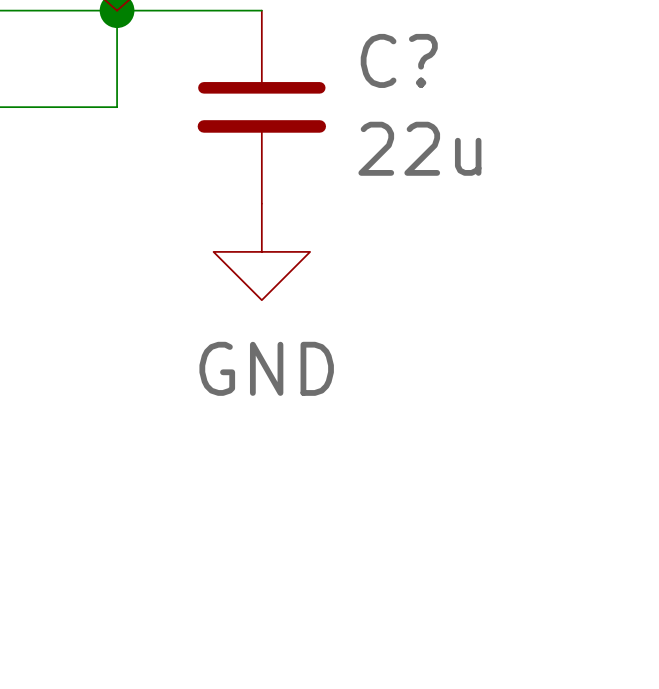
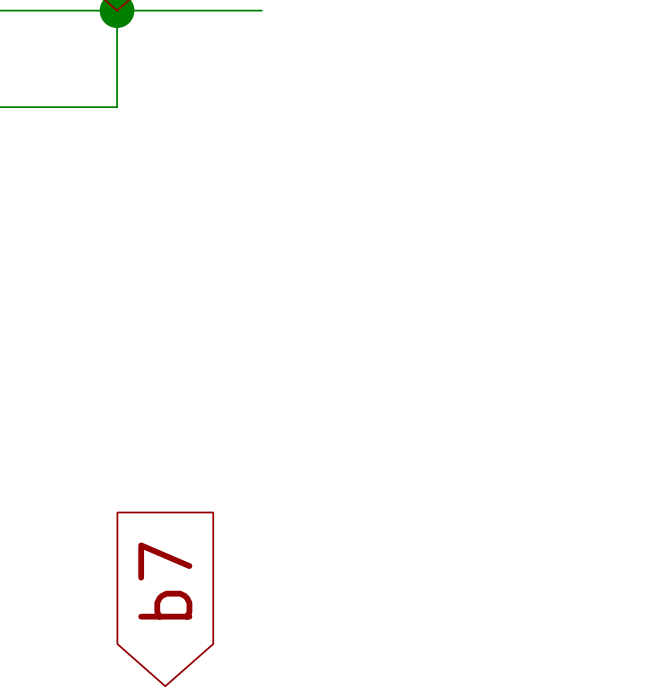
C?: 22u (261, 107) -> none
power symbol: GND (261, 251) -> none
global label: none -> b7 (165, 581)

